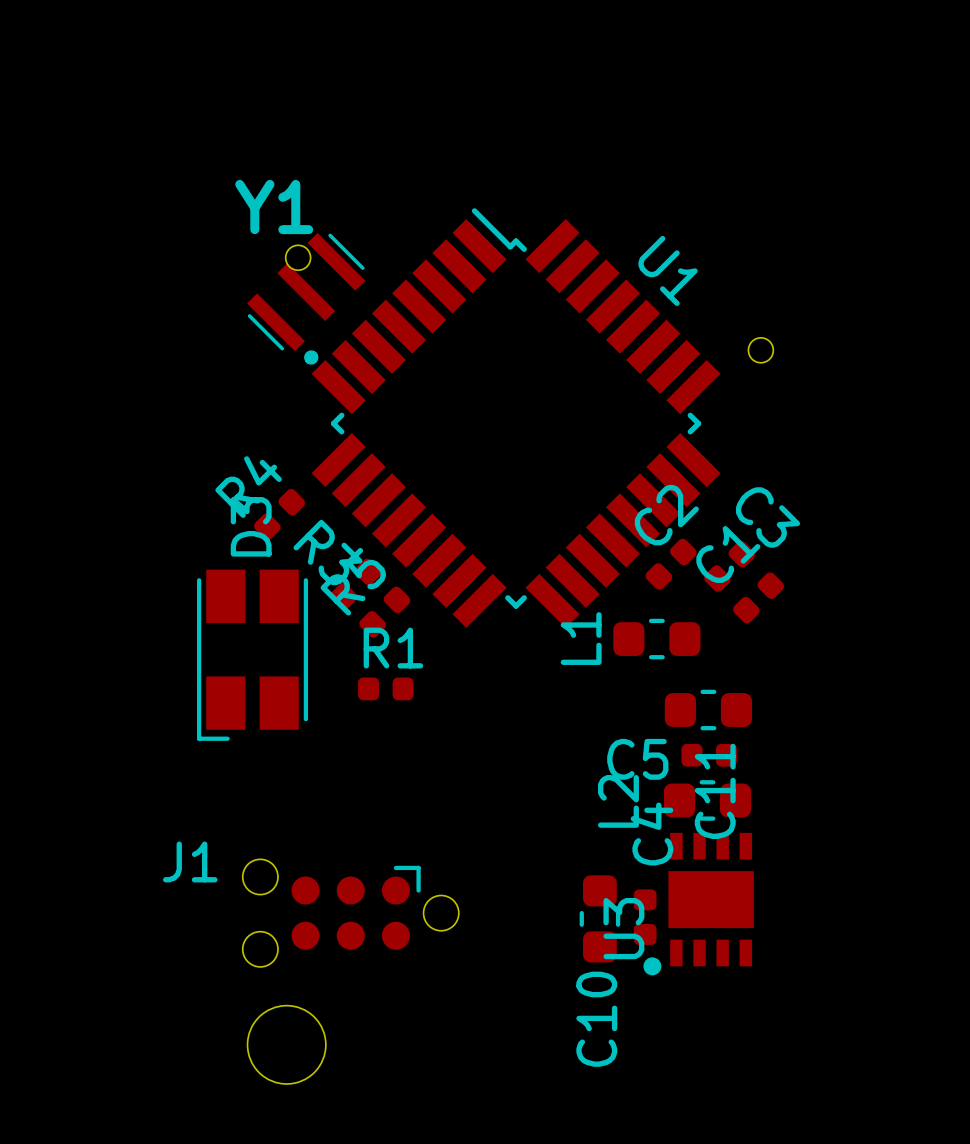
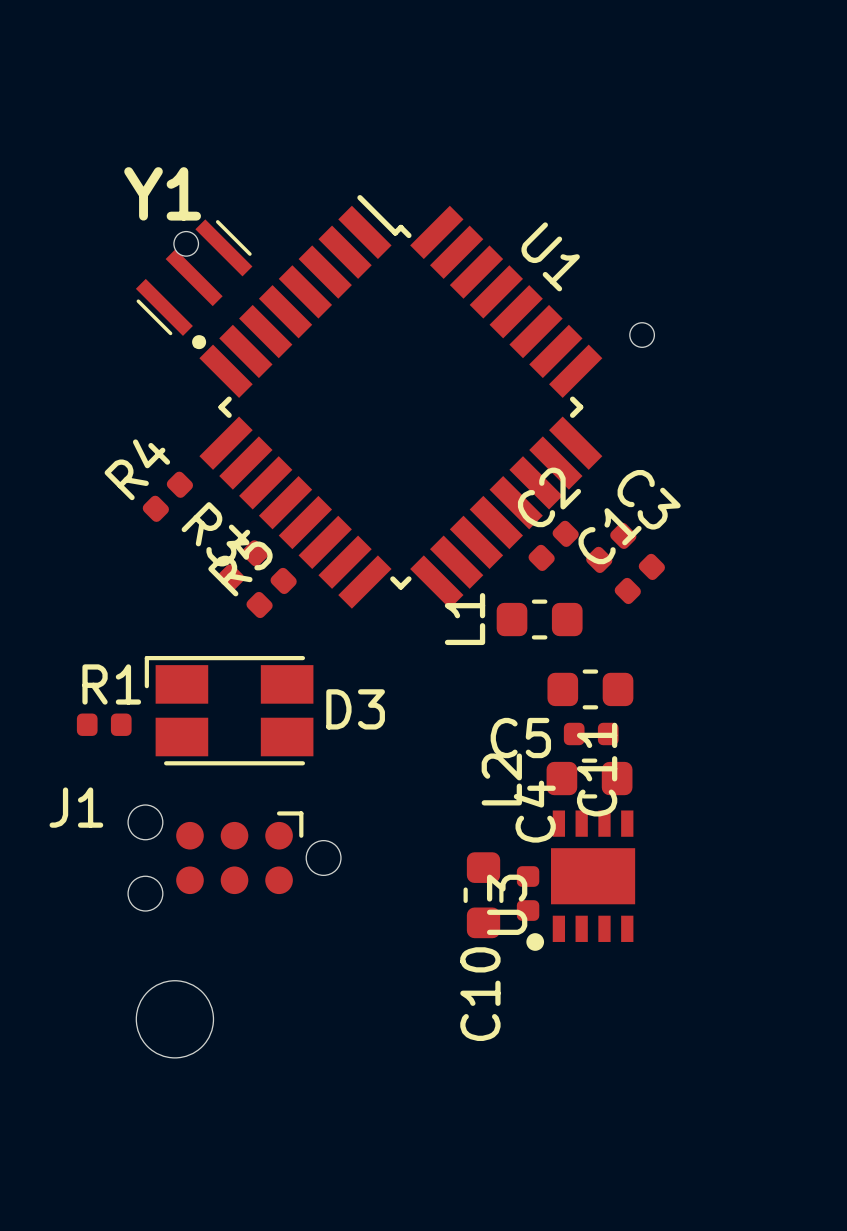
D3 rotation: 0° (252, 655) -> 90° clockwise (229, 710)
D3 position: (252, 655) -> (229, 710)
R1 position: (385, 688) -> (104, 724)
J1 position: (350, 913) -> (234, 857)

